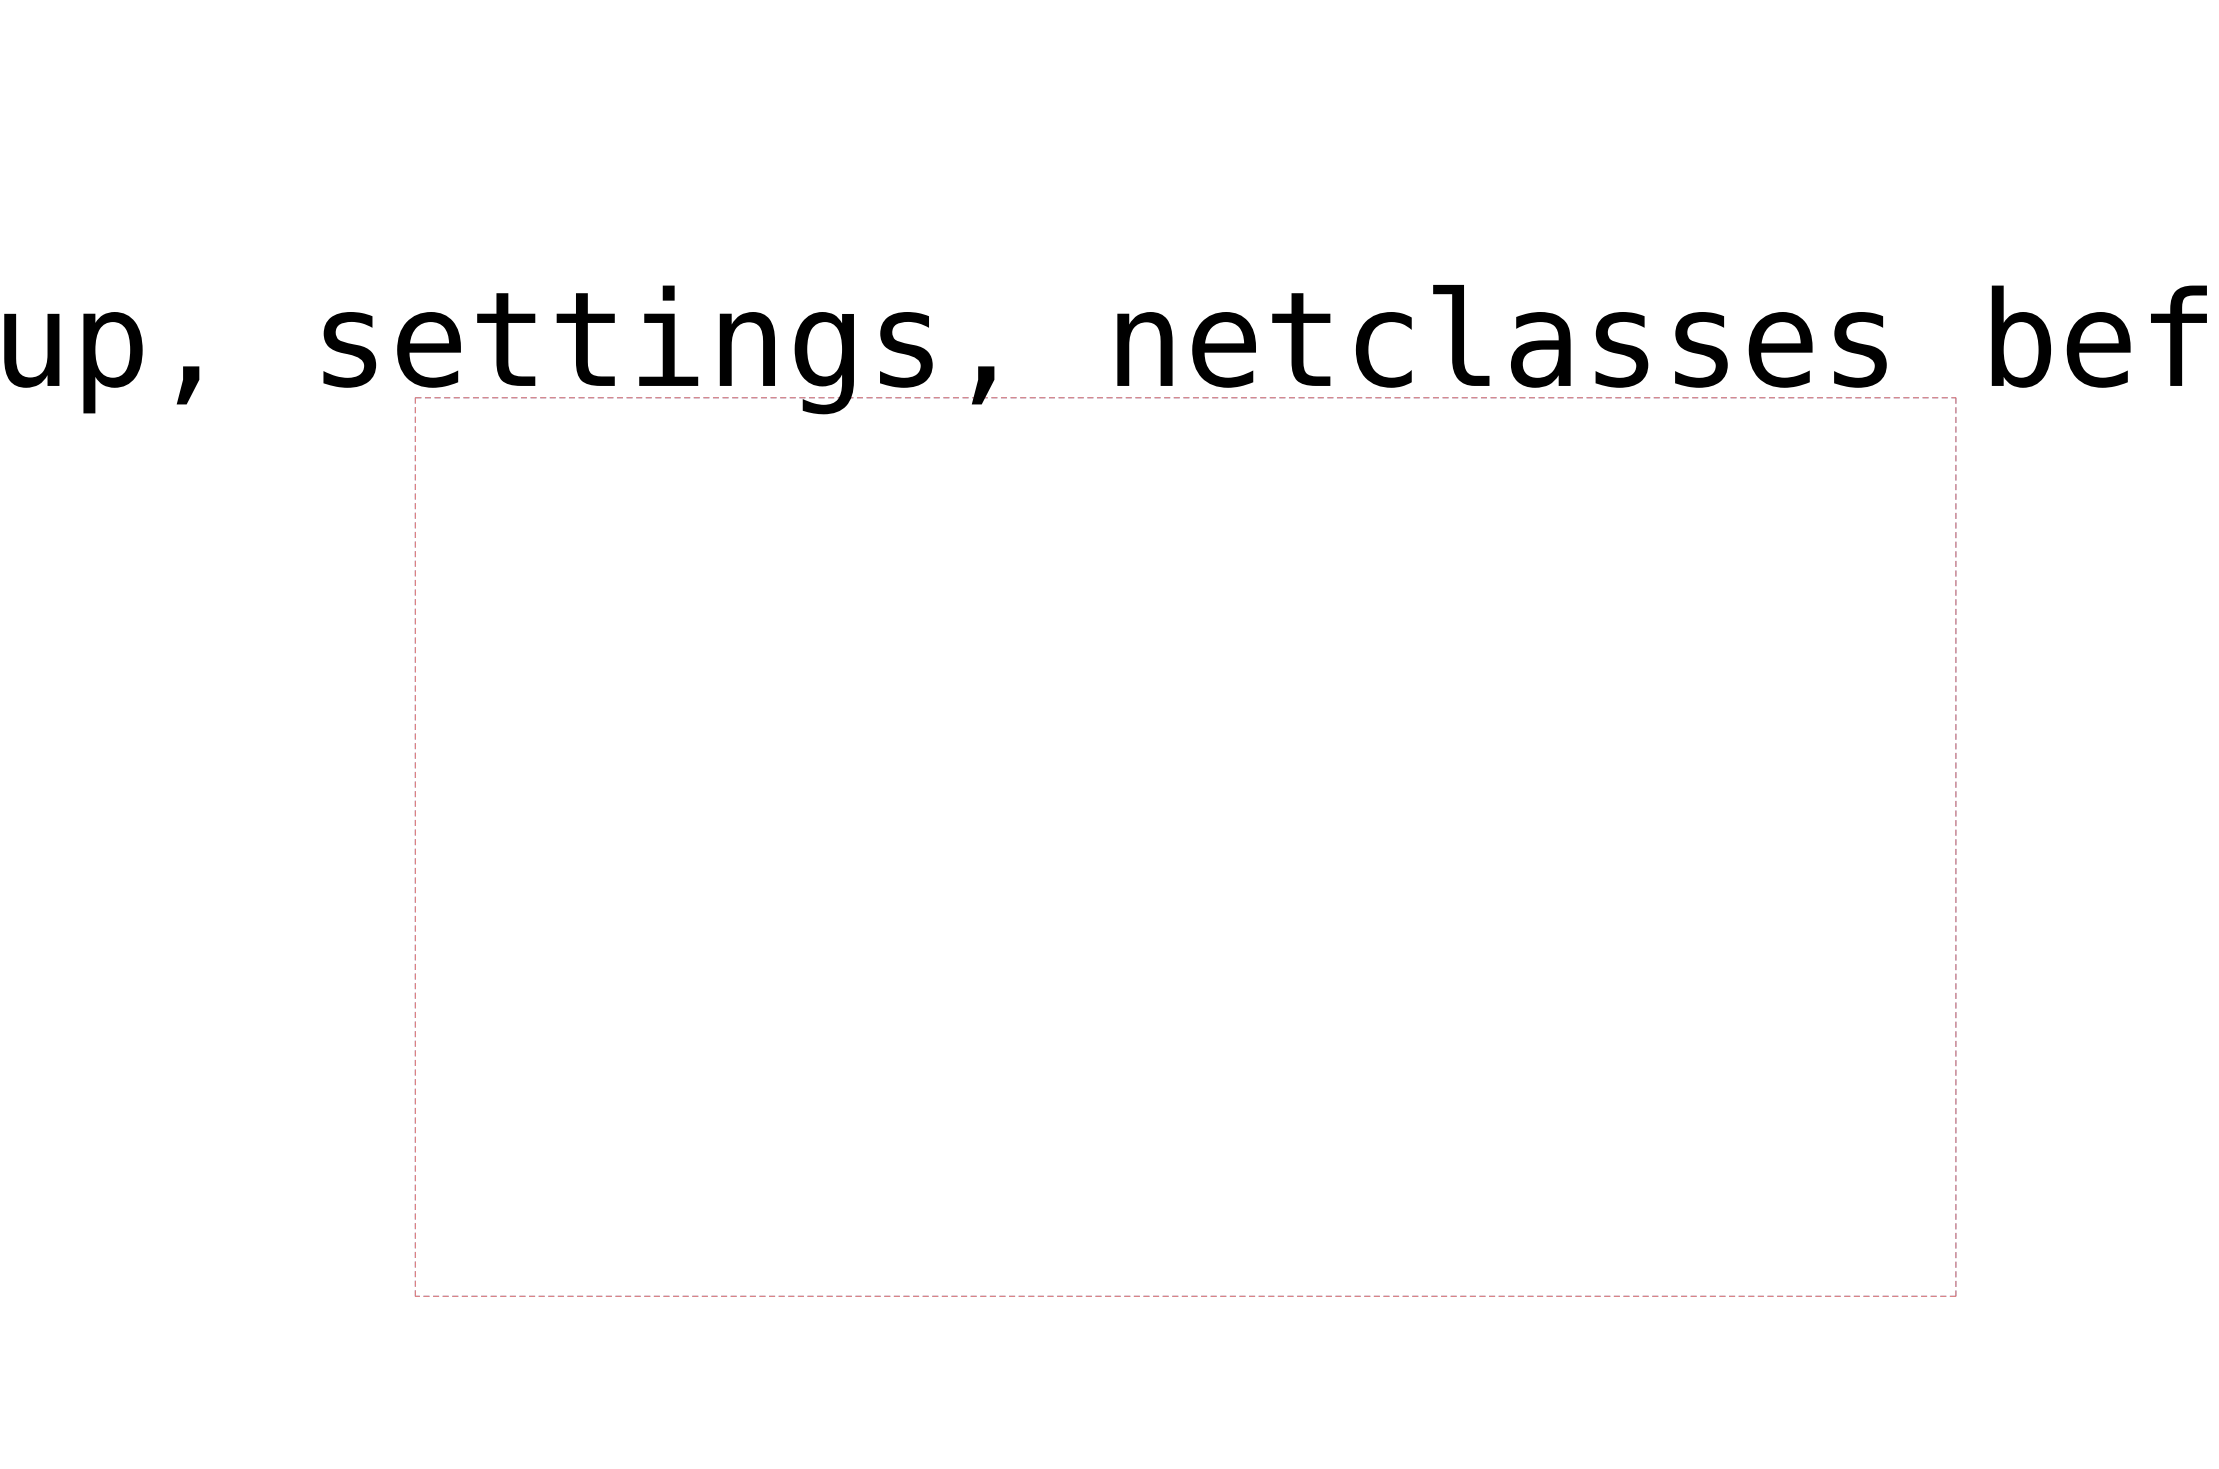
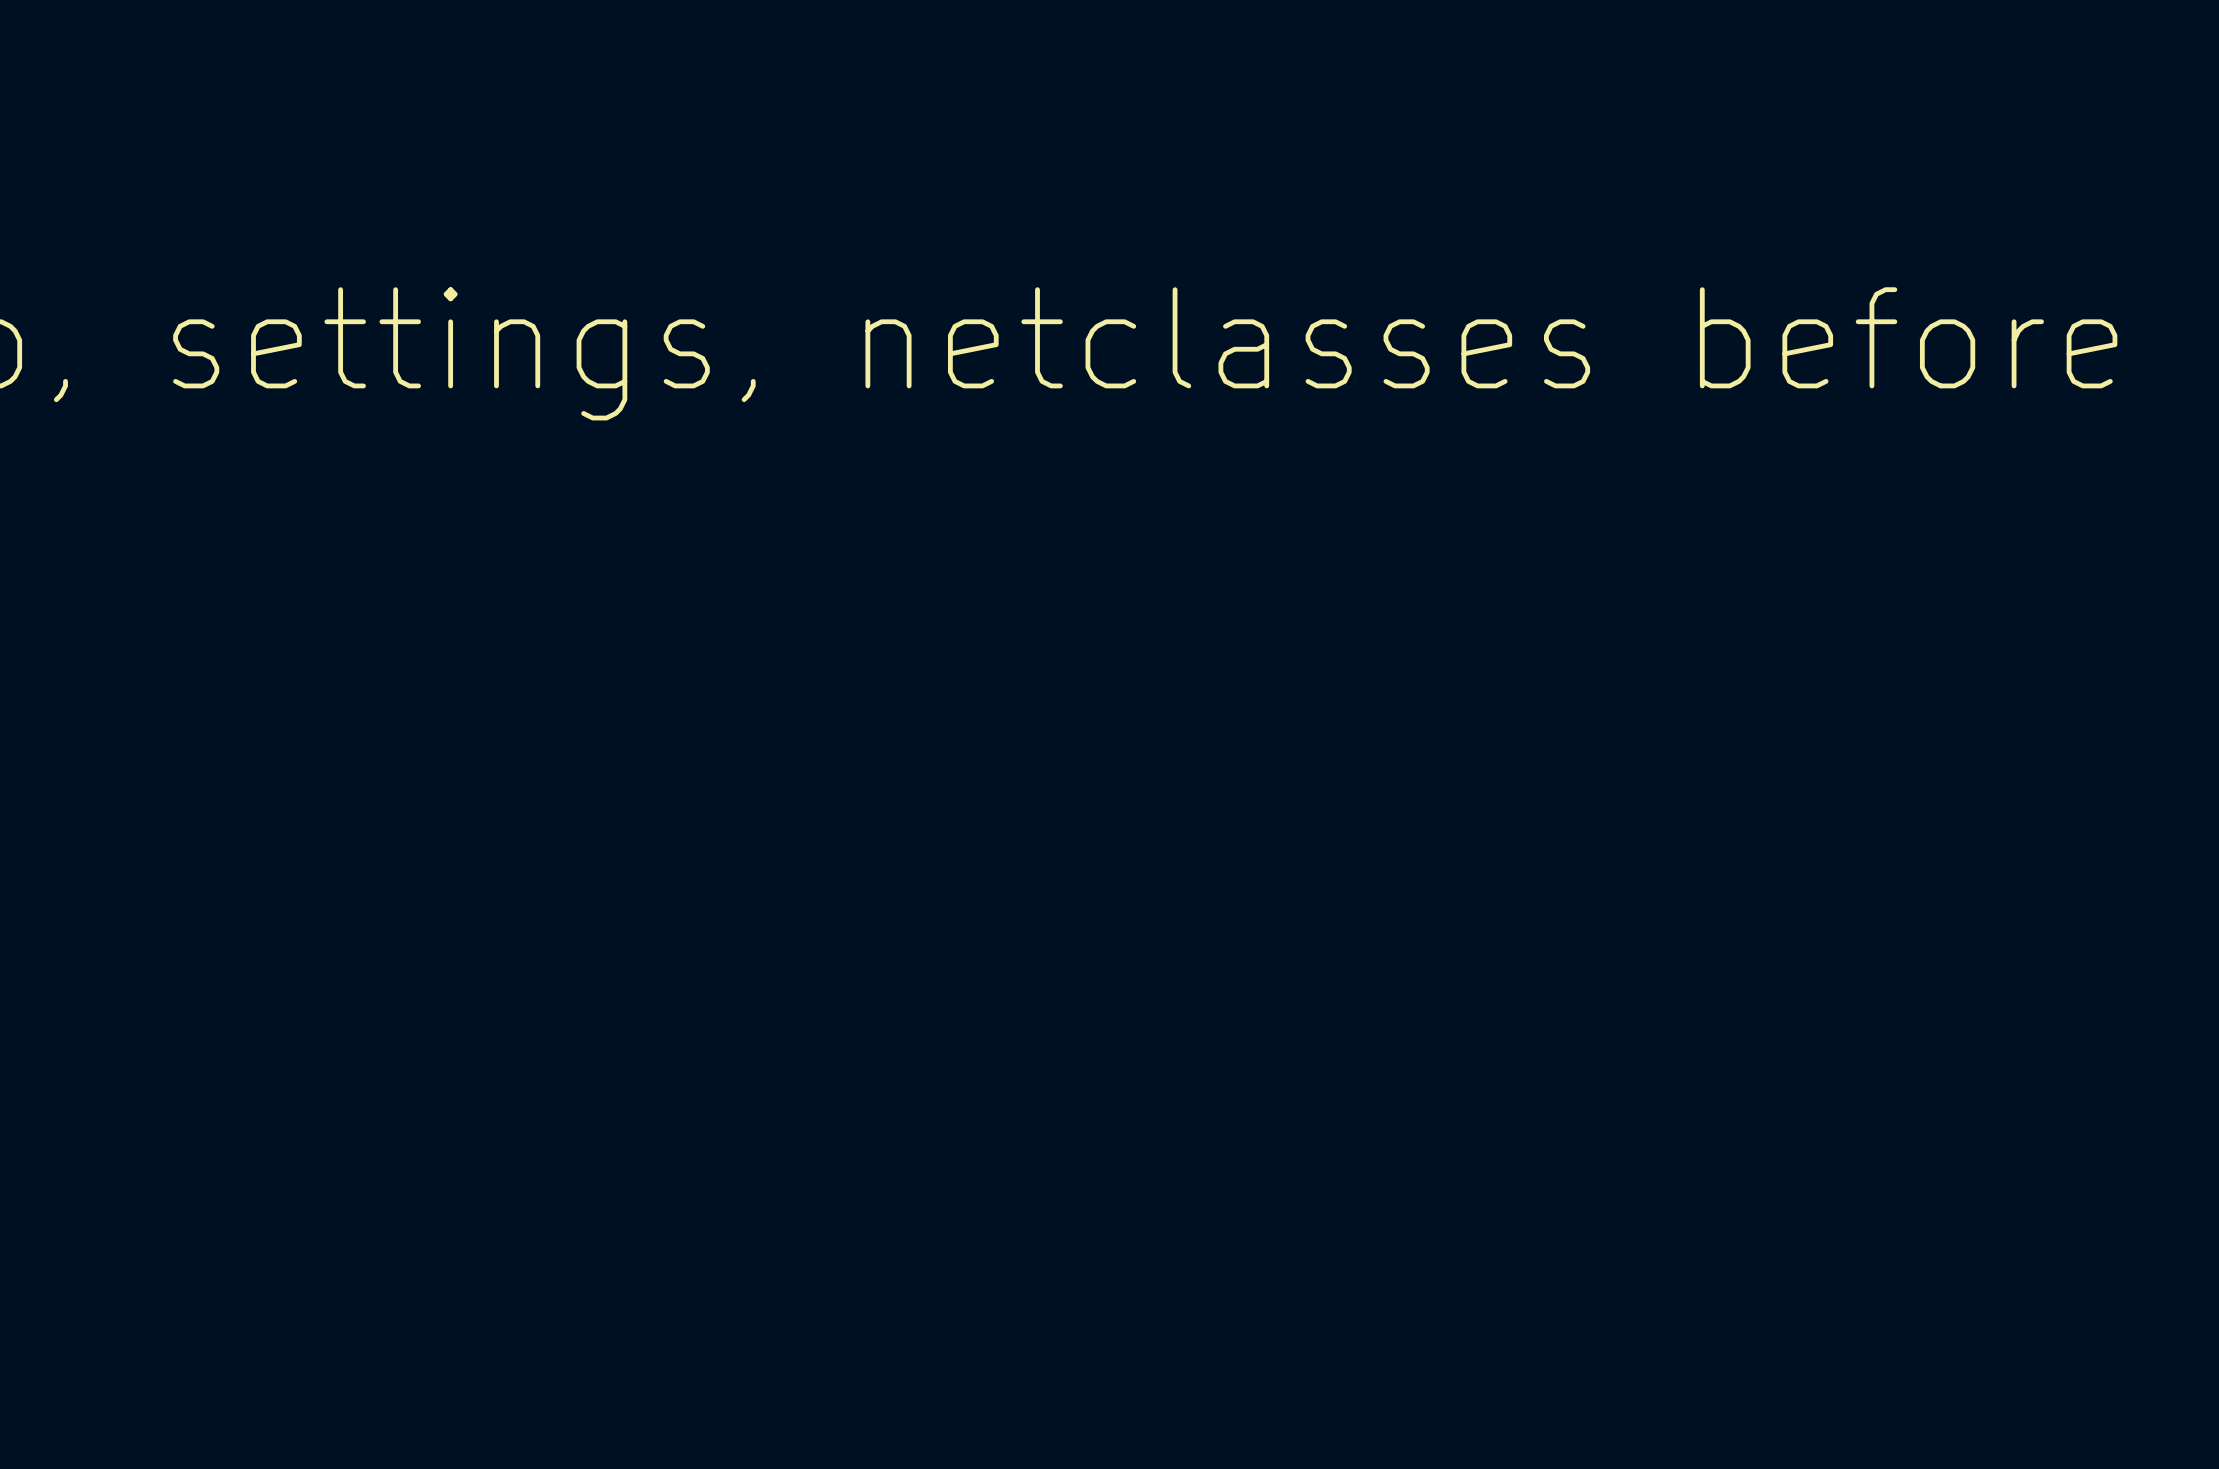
top zone outline: (415, 397) (415, 1296) (1955, 1296) (1955, 397) (415, 397) -> none

